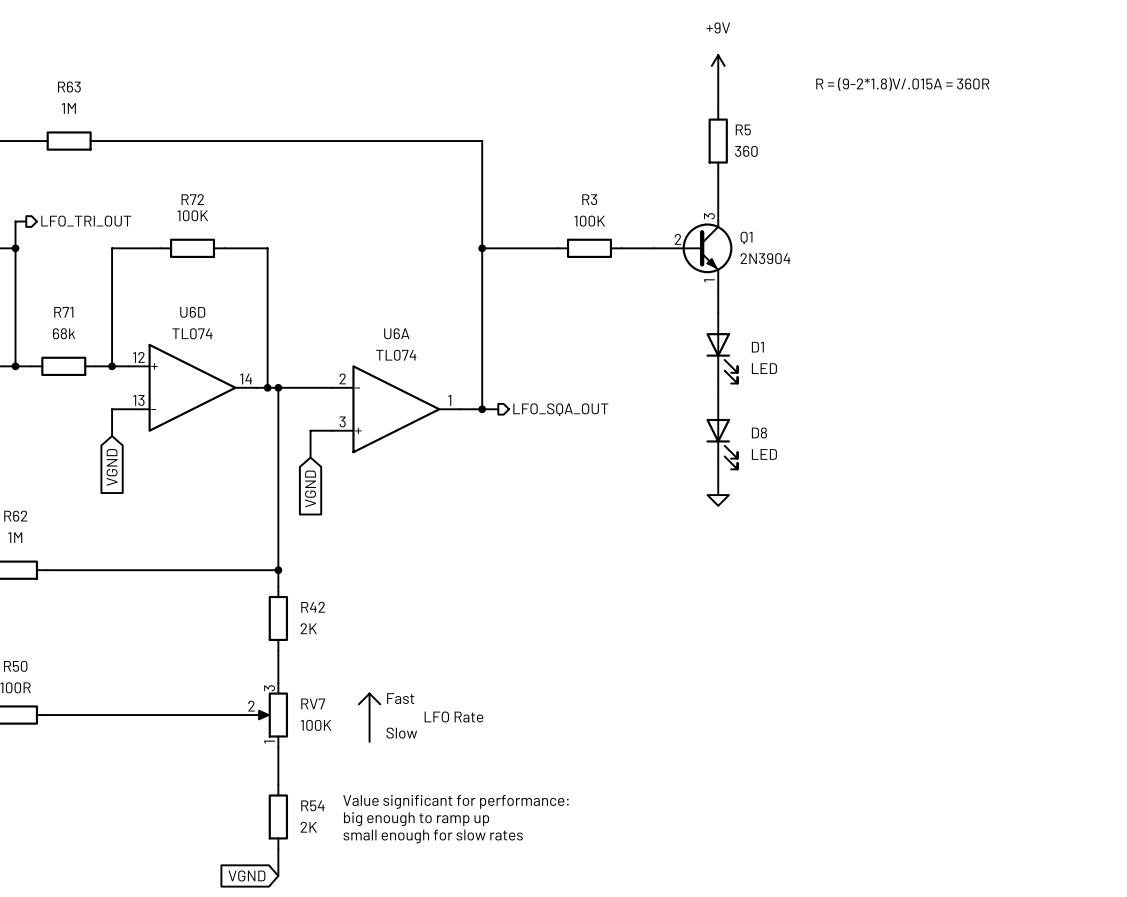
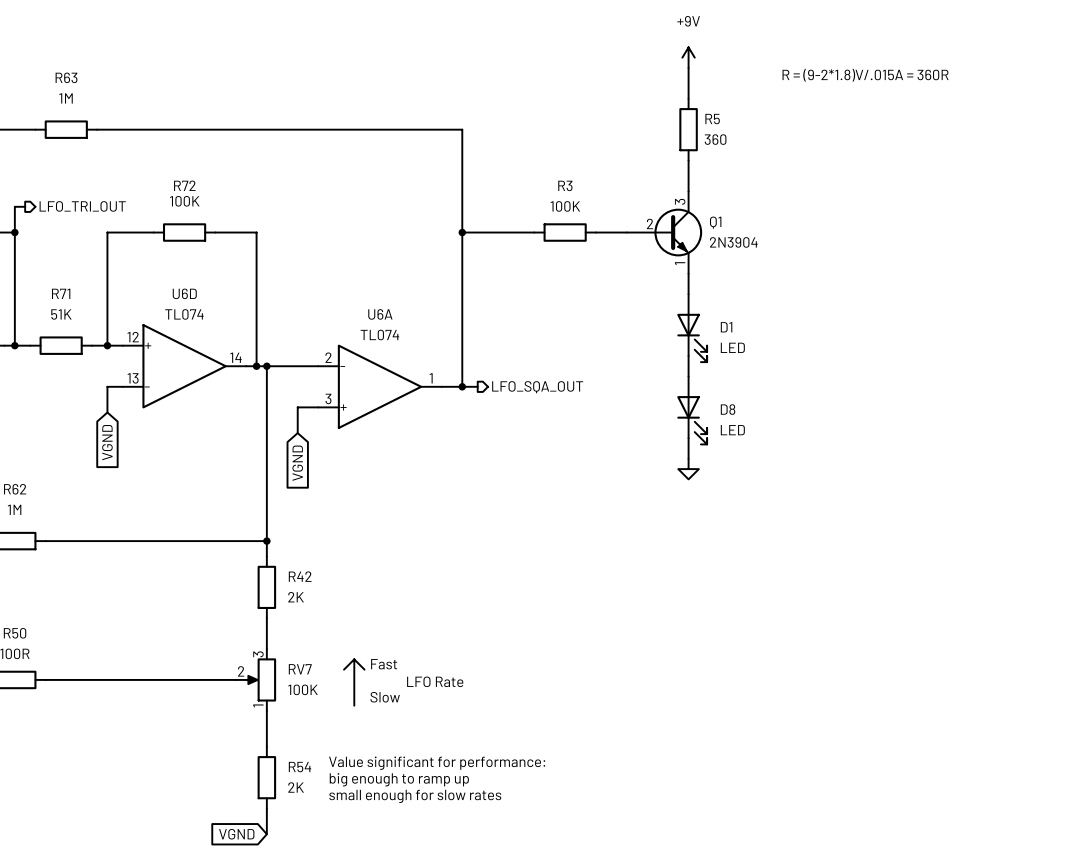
R71 value: 68k (64, 333) -> 51K (61, 314)

